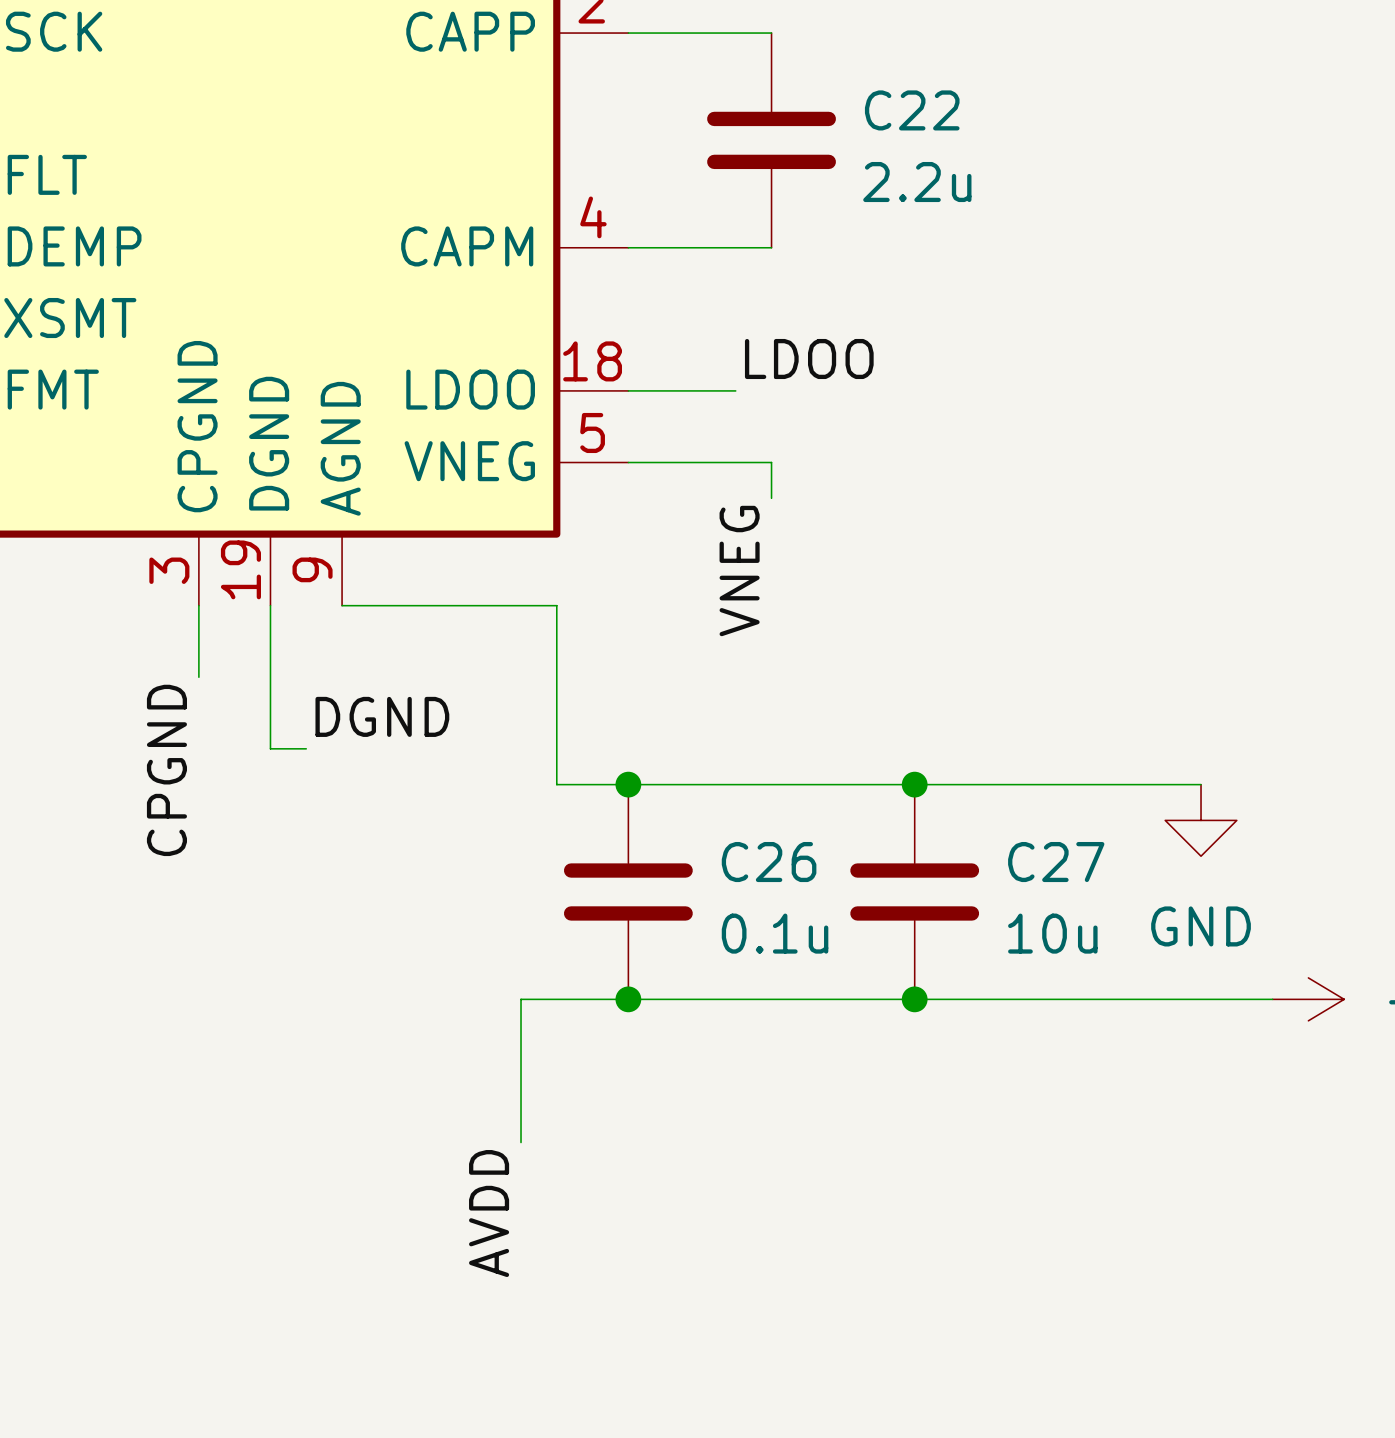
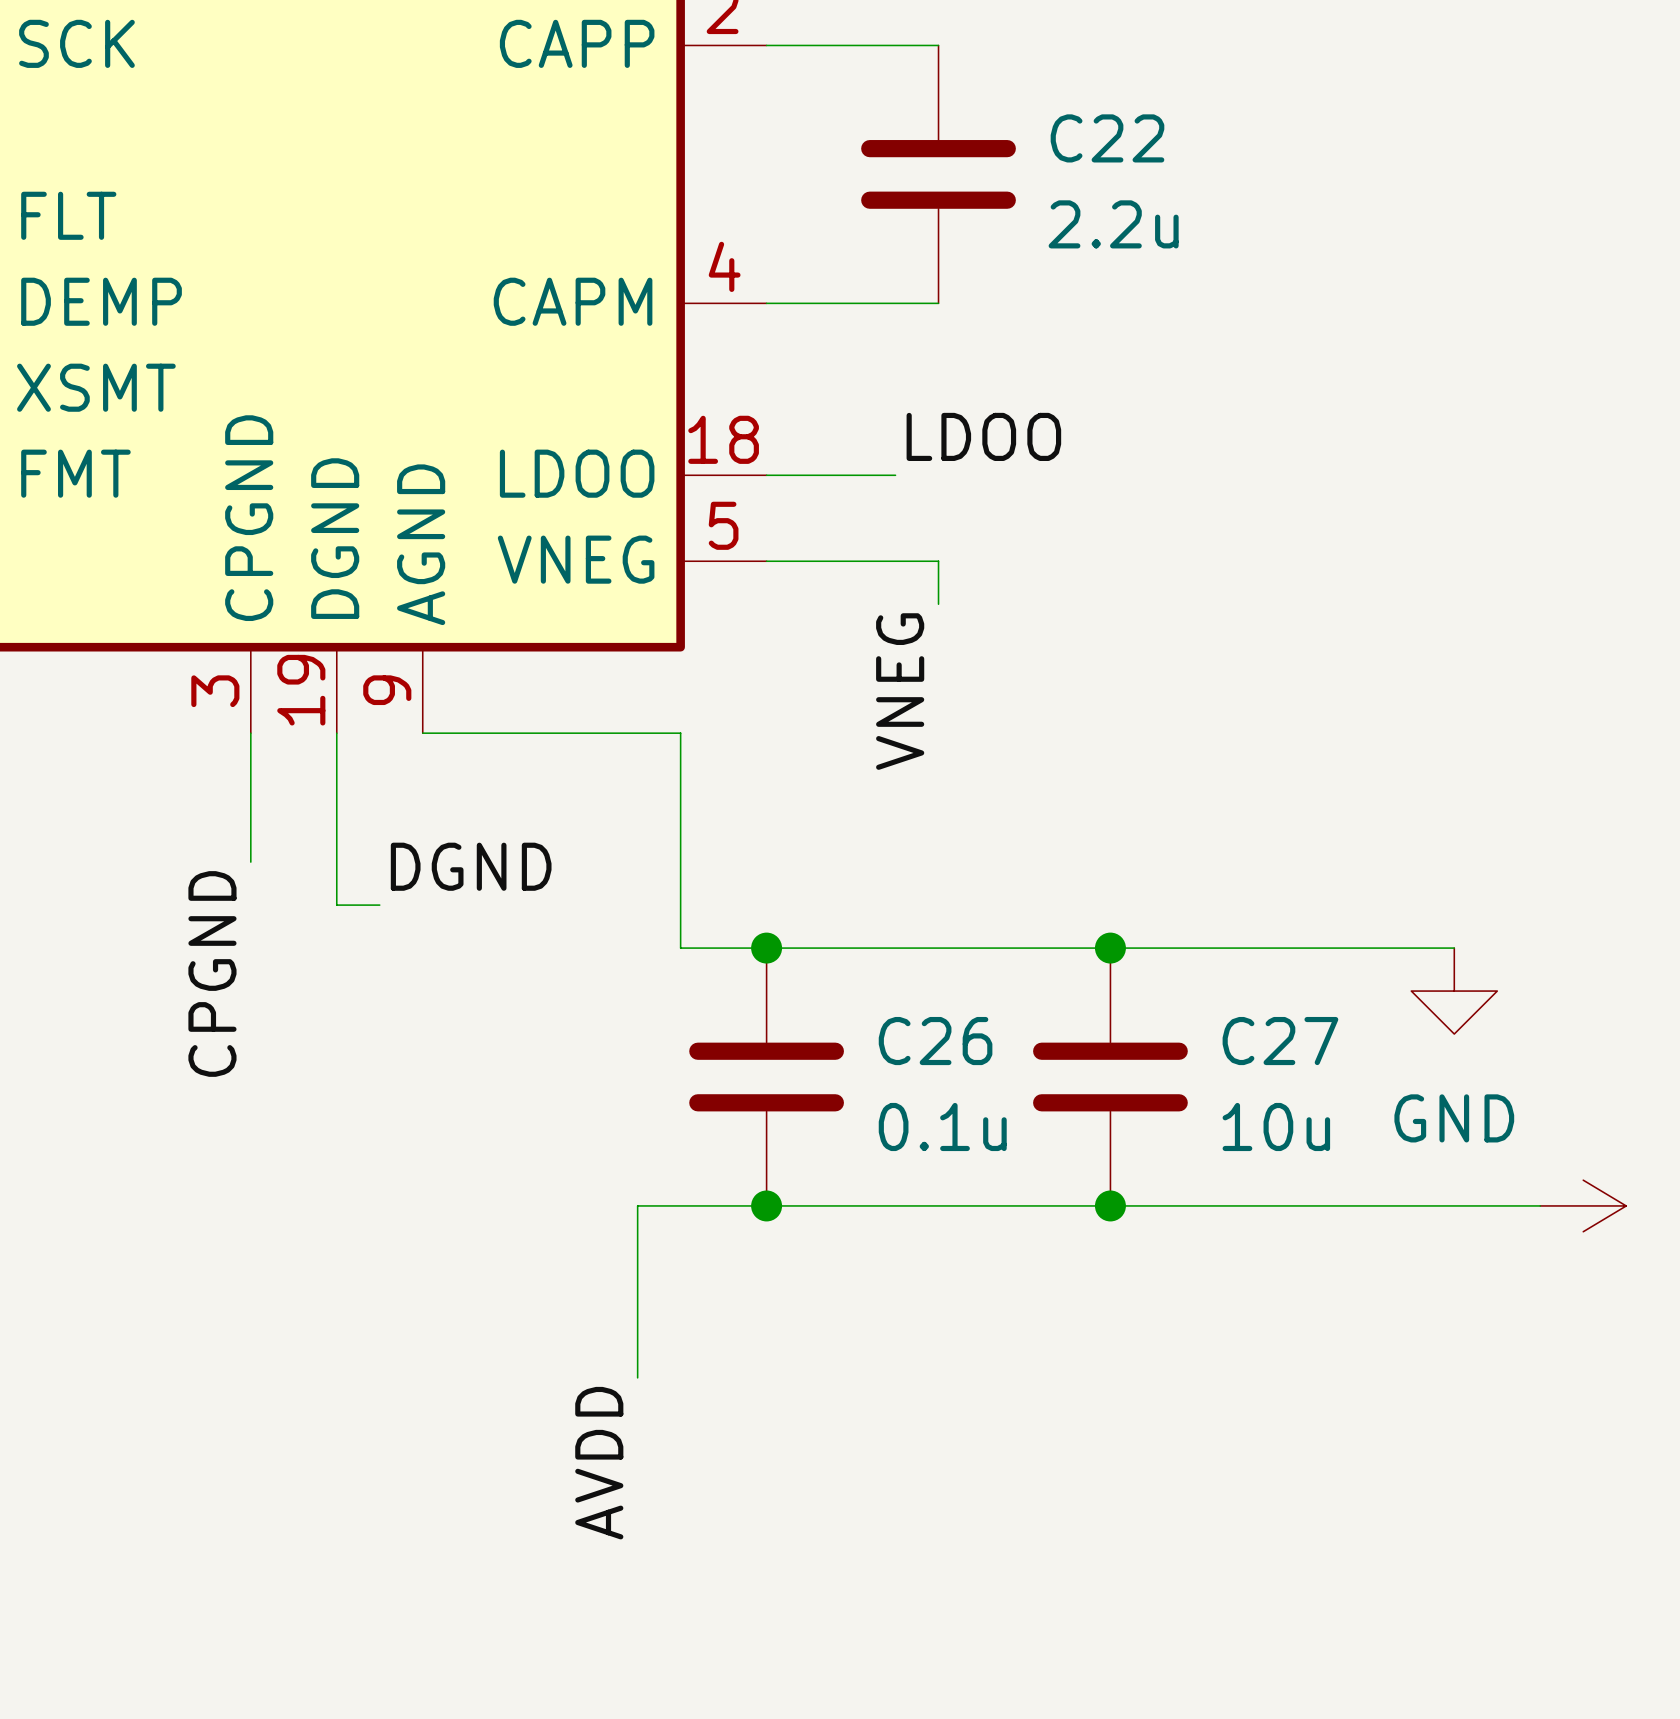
wire: none -> (250, 819) (250, 862)
label position: CPGND (166, 770) -> CPGND (212, 973)

